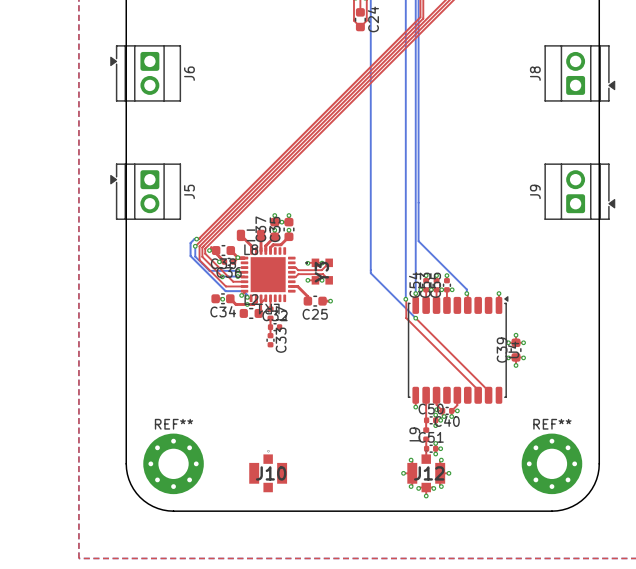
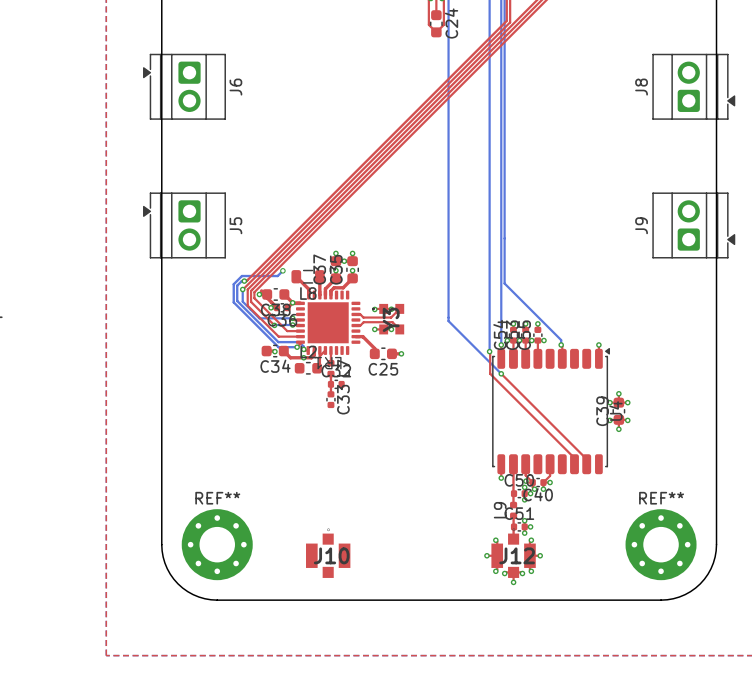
bottom track: none -> (282, 270) (277, 276) (241, 276) (233, 284) (233, 302) (278, 347) (297, 347)
via: none -> (282, 270)

